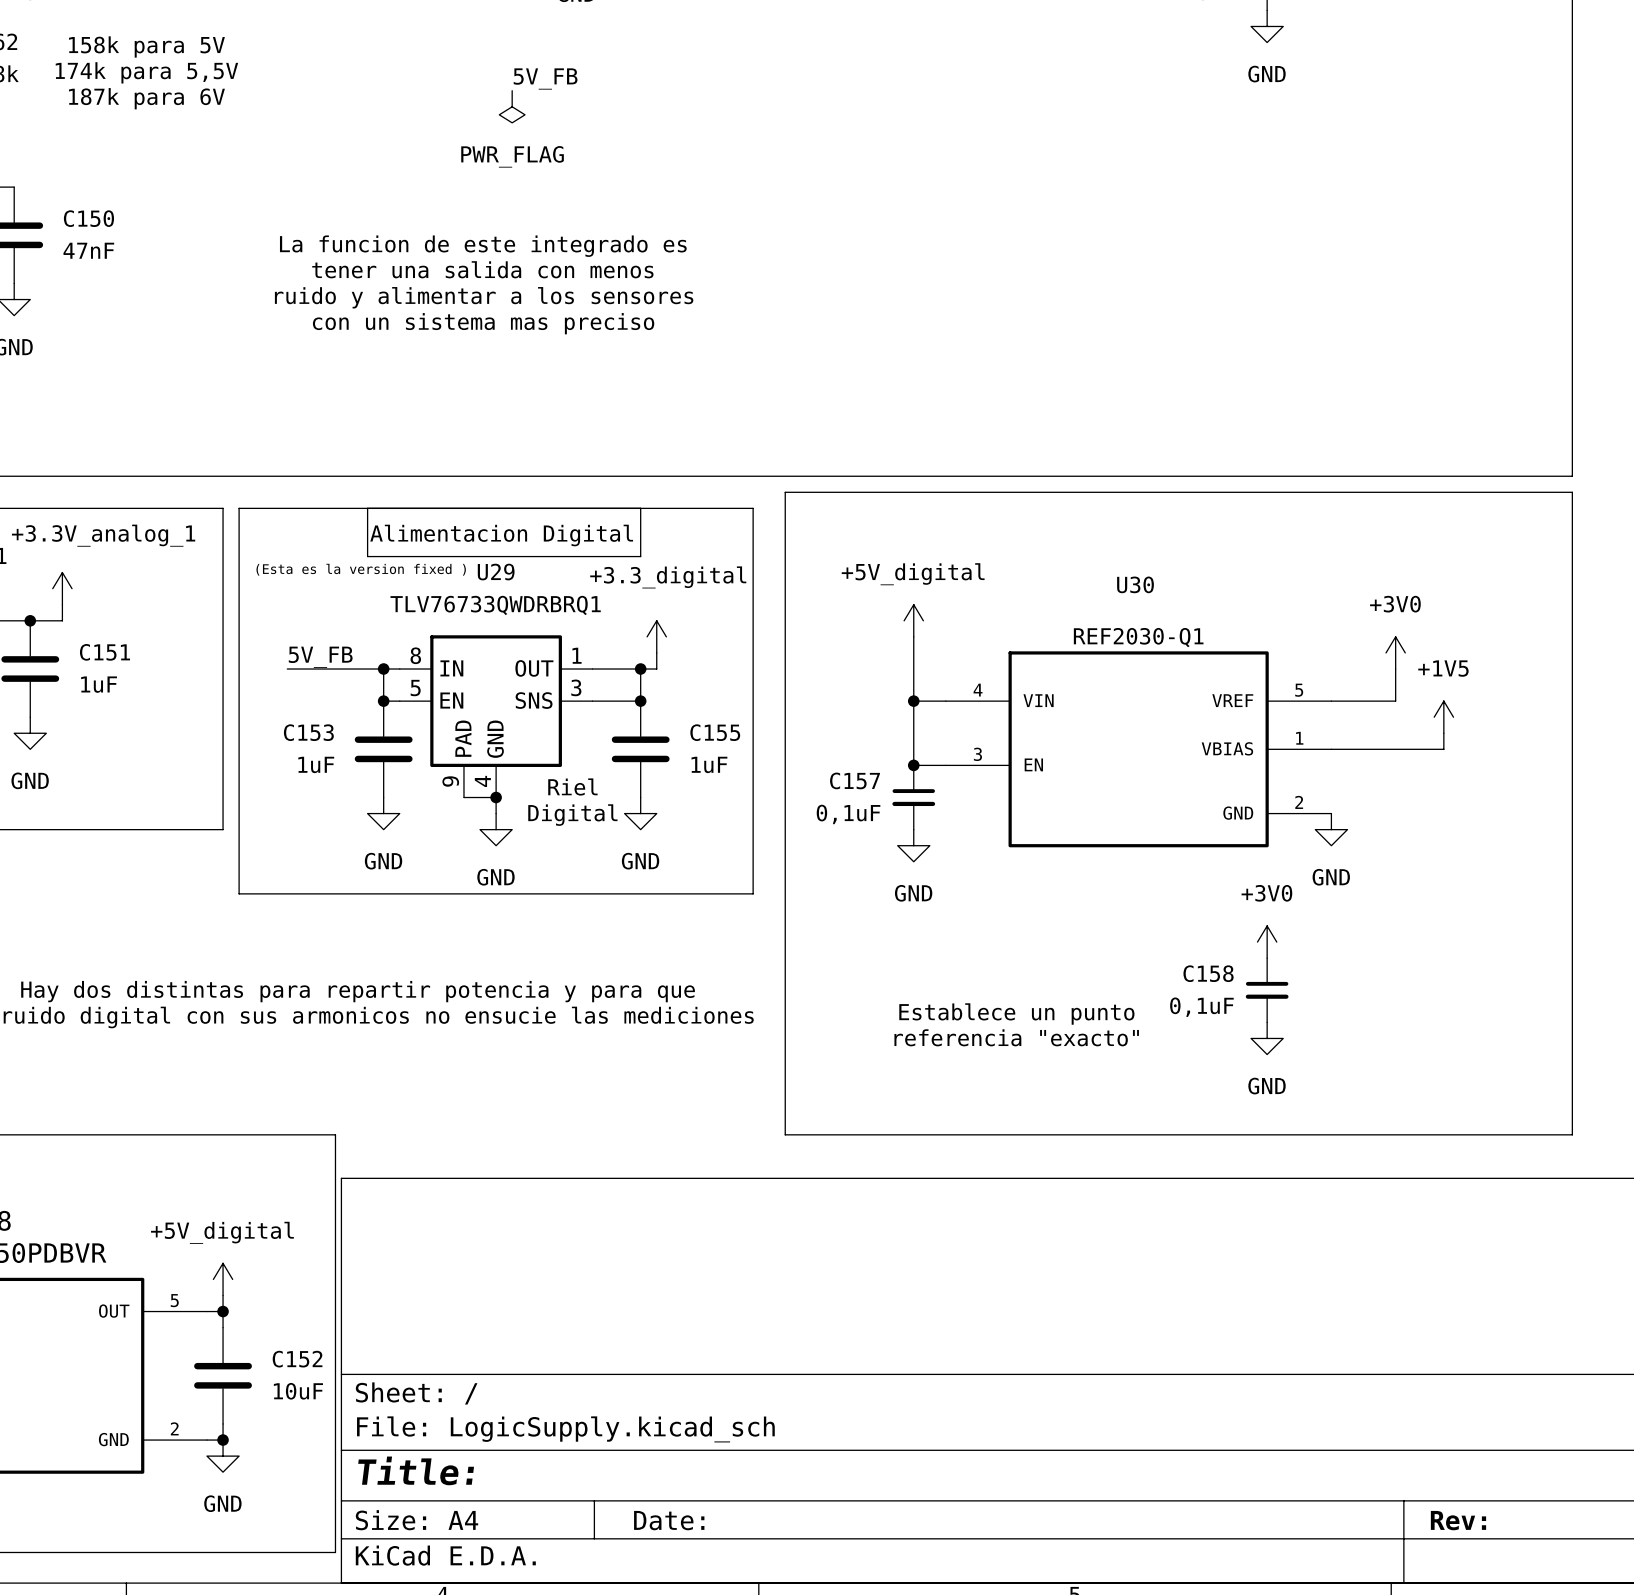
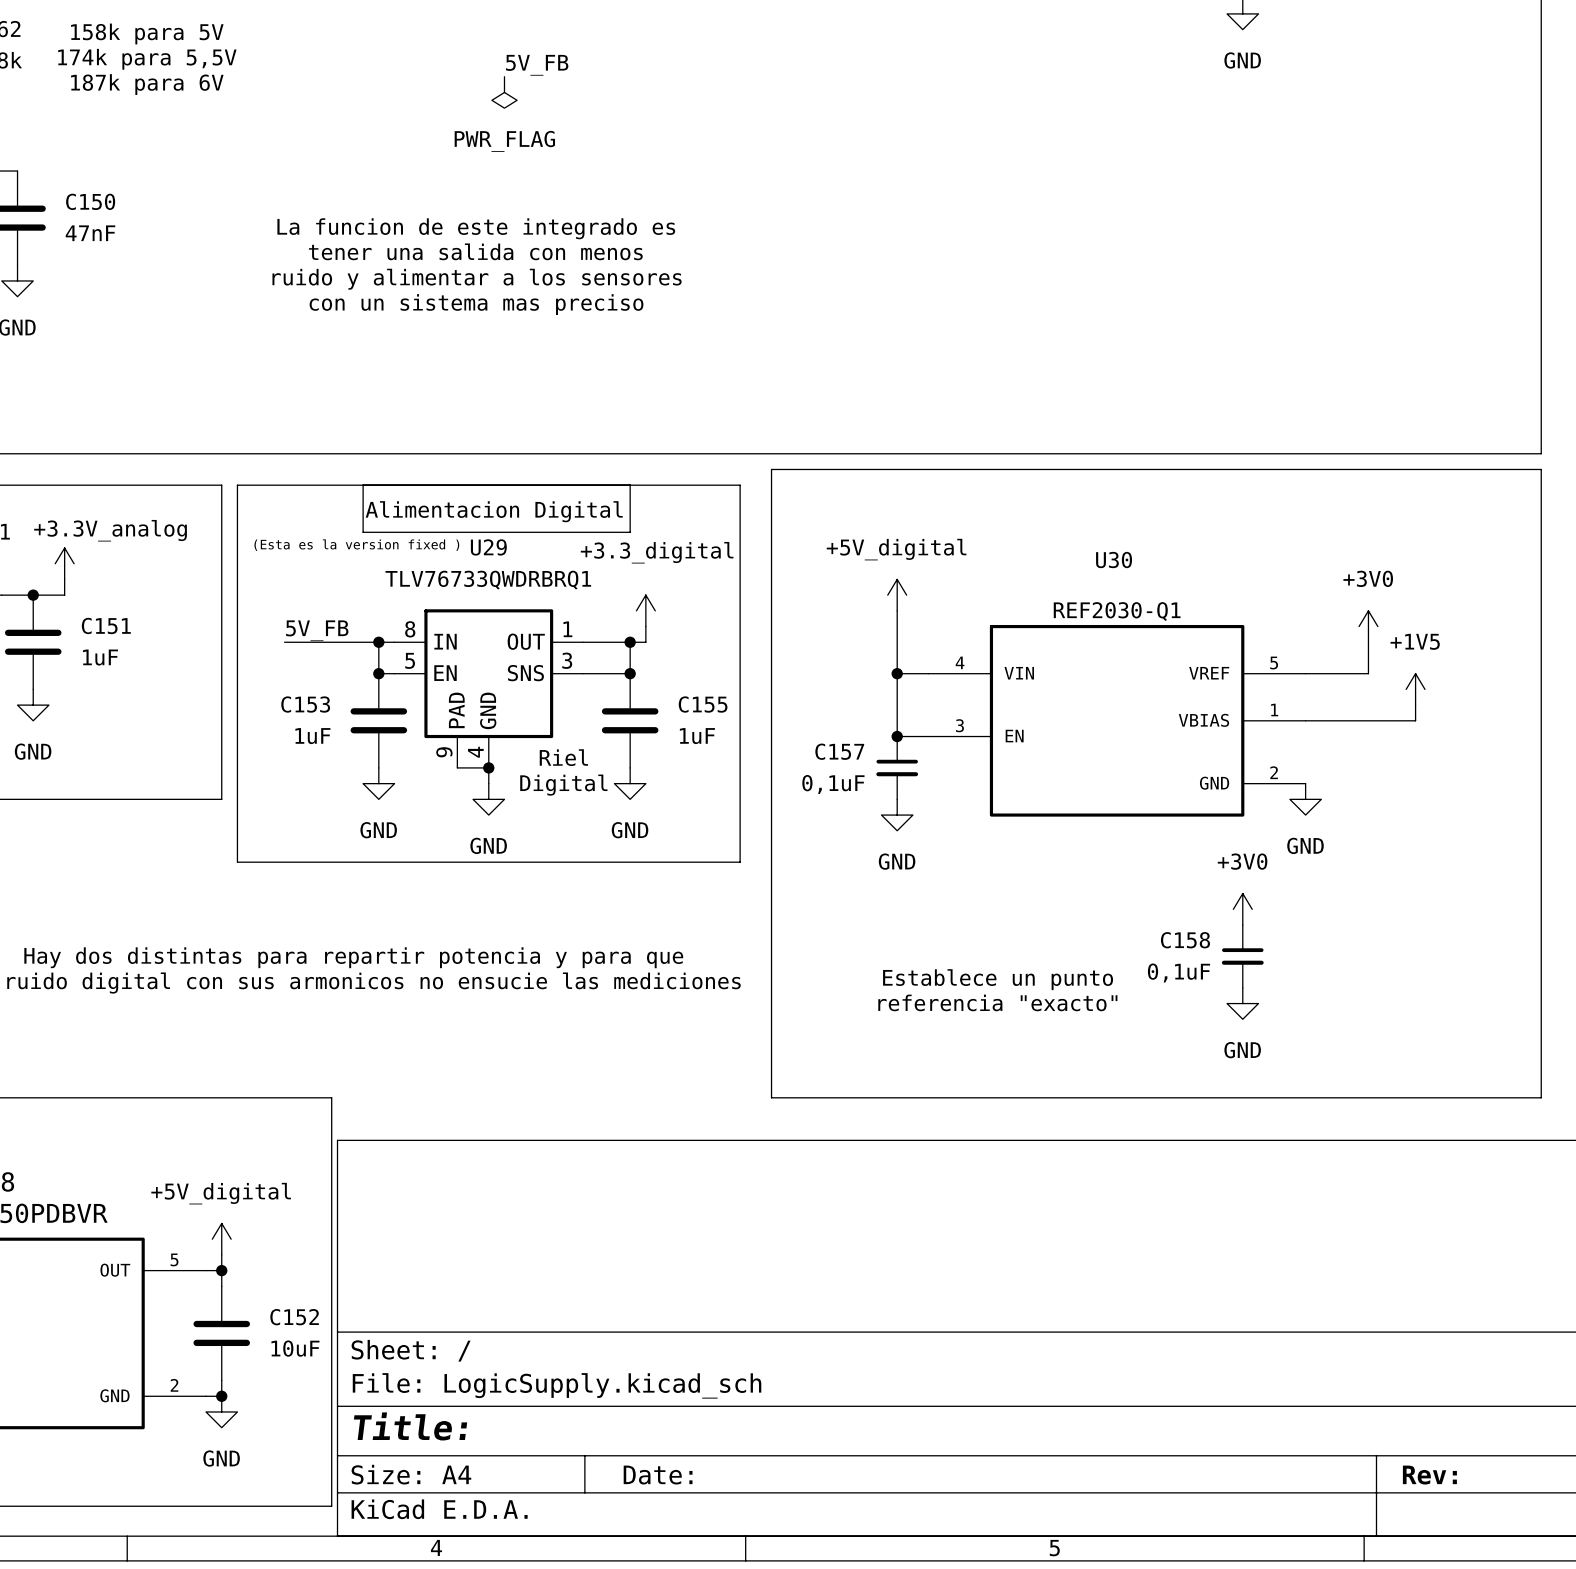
power symbol: +3.3V_analog_1 (62, 588) -> +3.3V_analog (64, 563)

